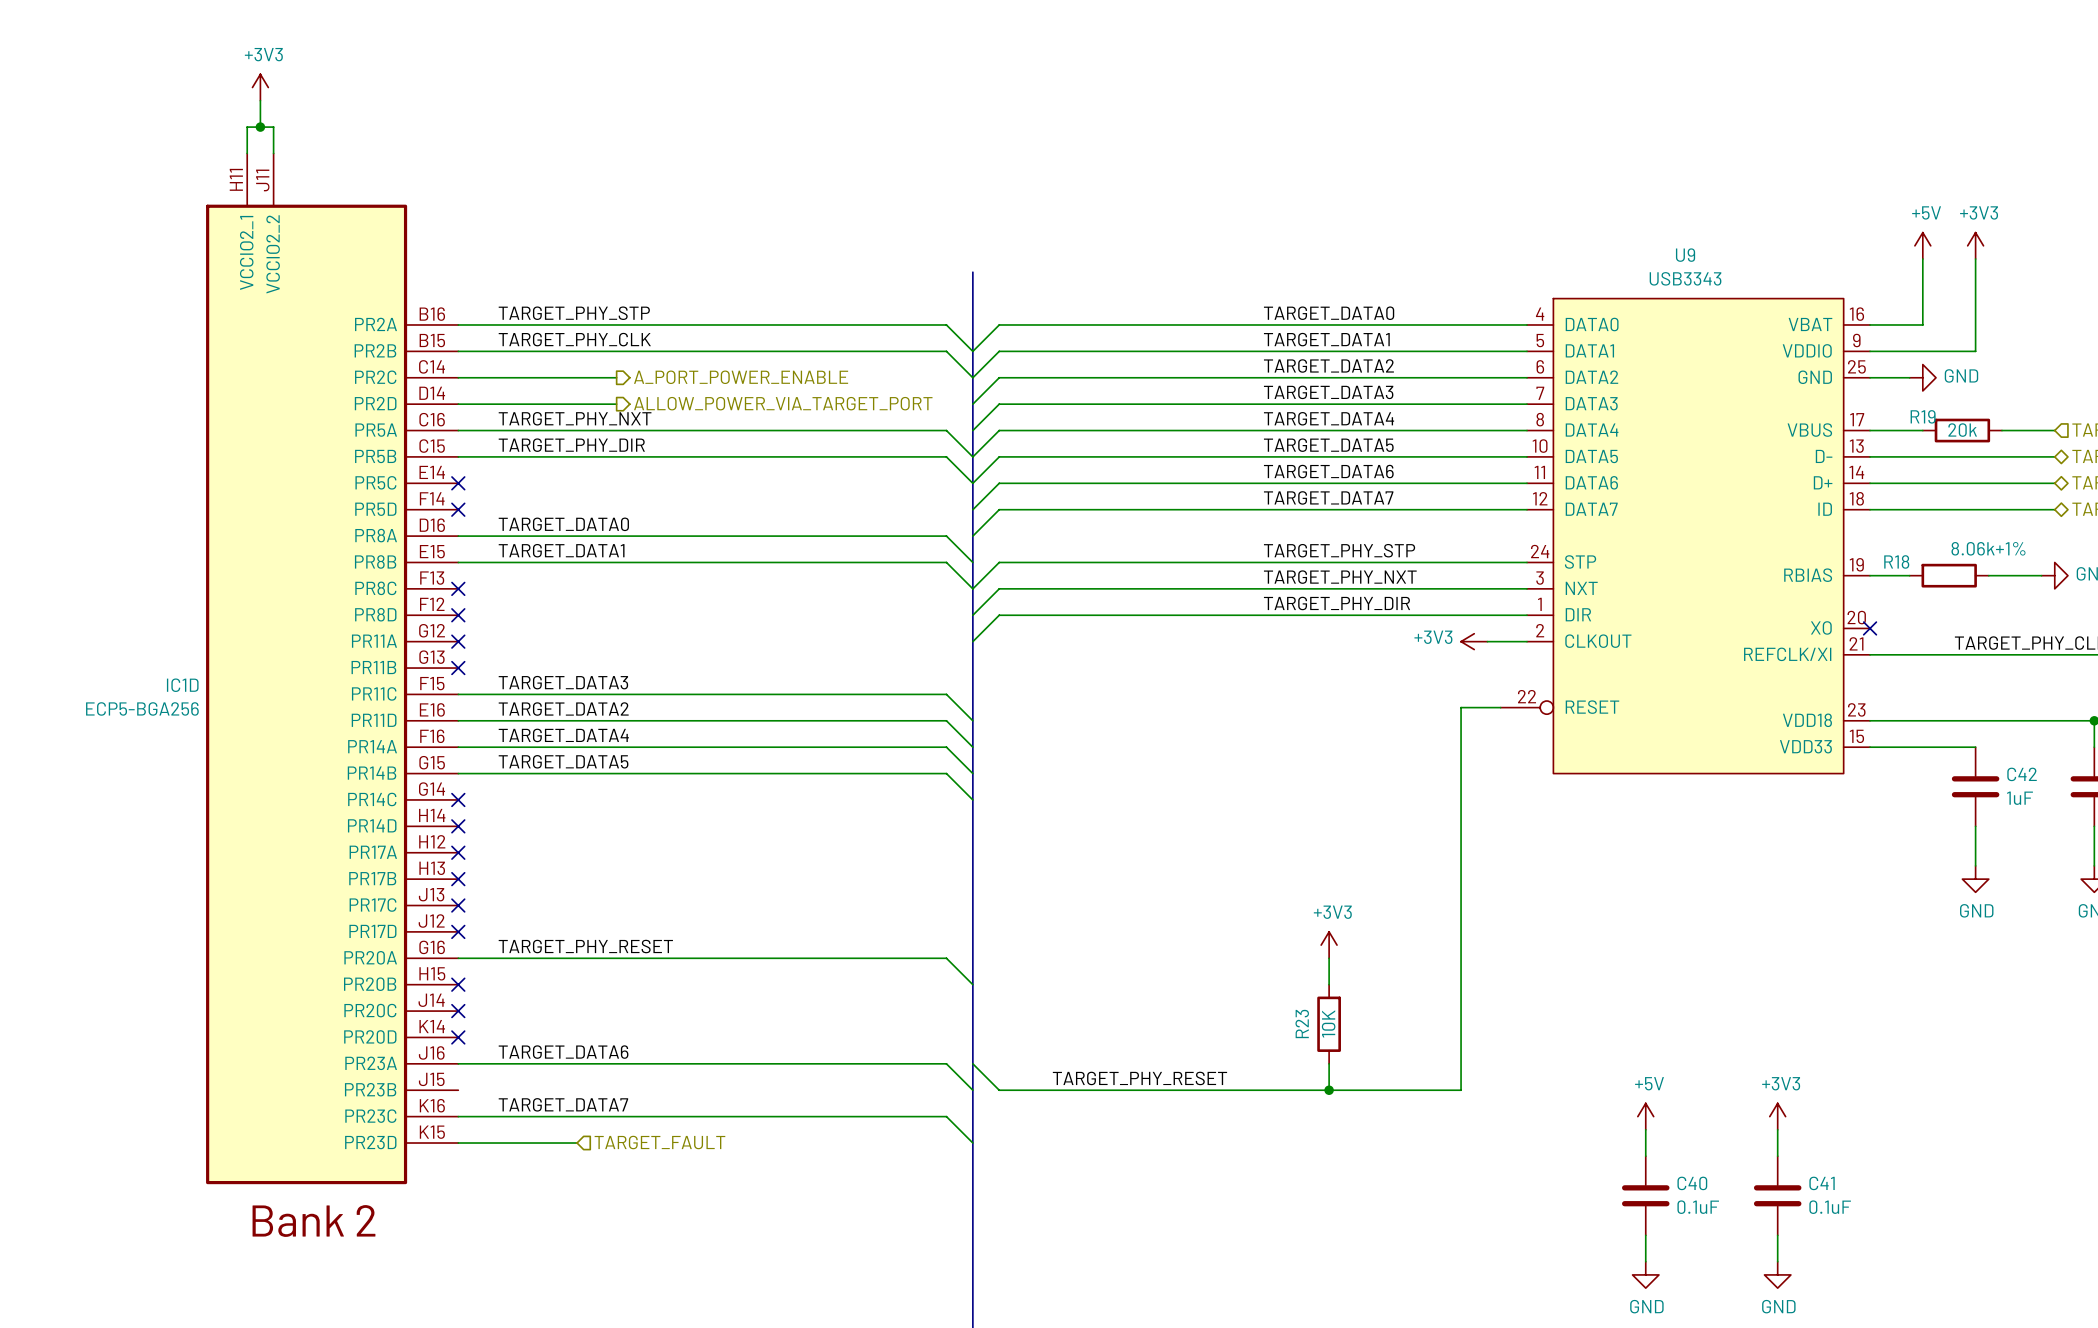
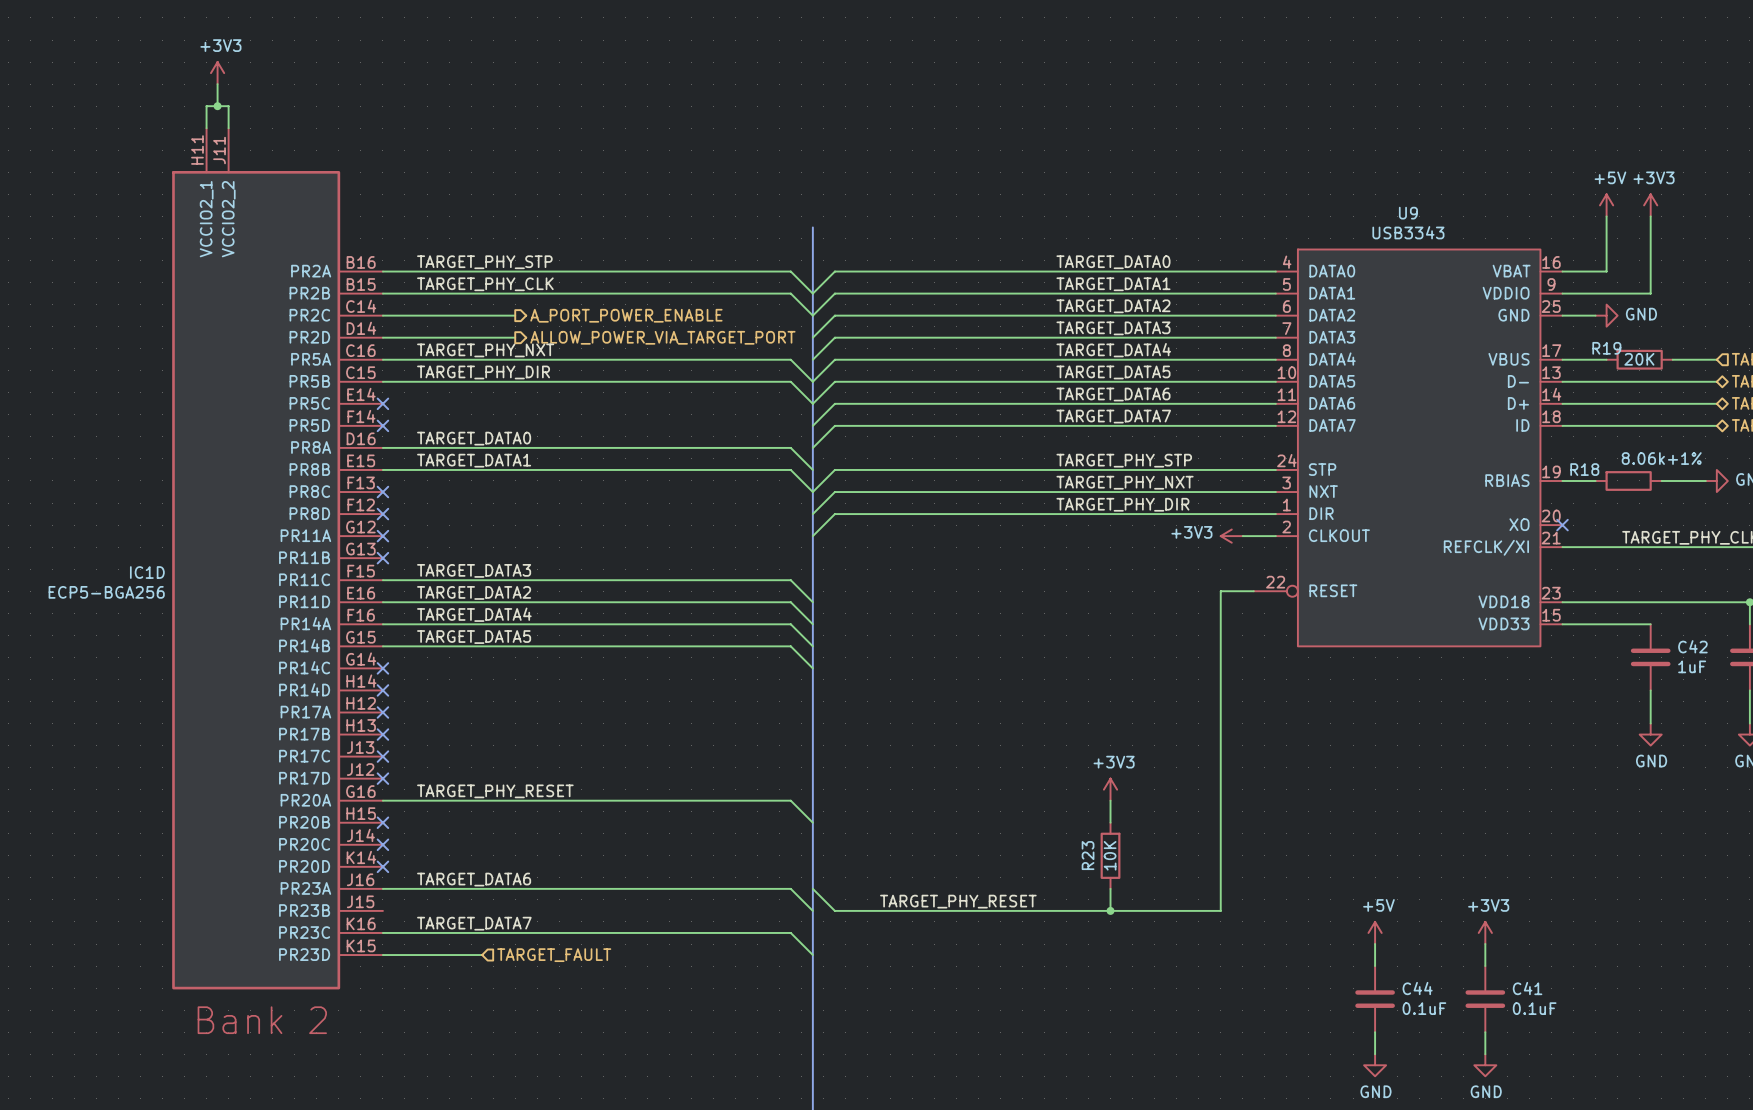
R19 value: 20k (1962, 430) -> 20K (1639, 359)
C40 name: C40 (1692, 1183) -> C44 (1417, 988)

